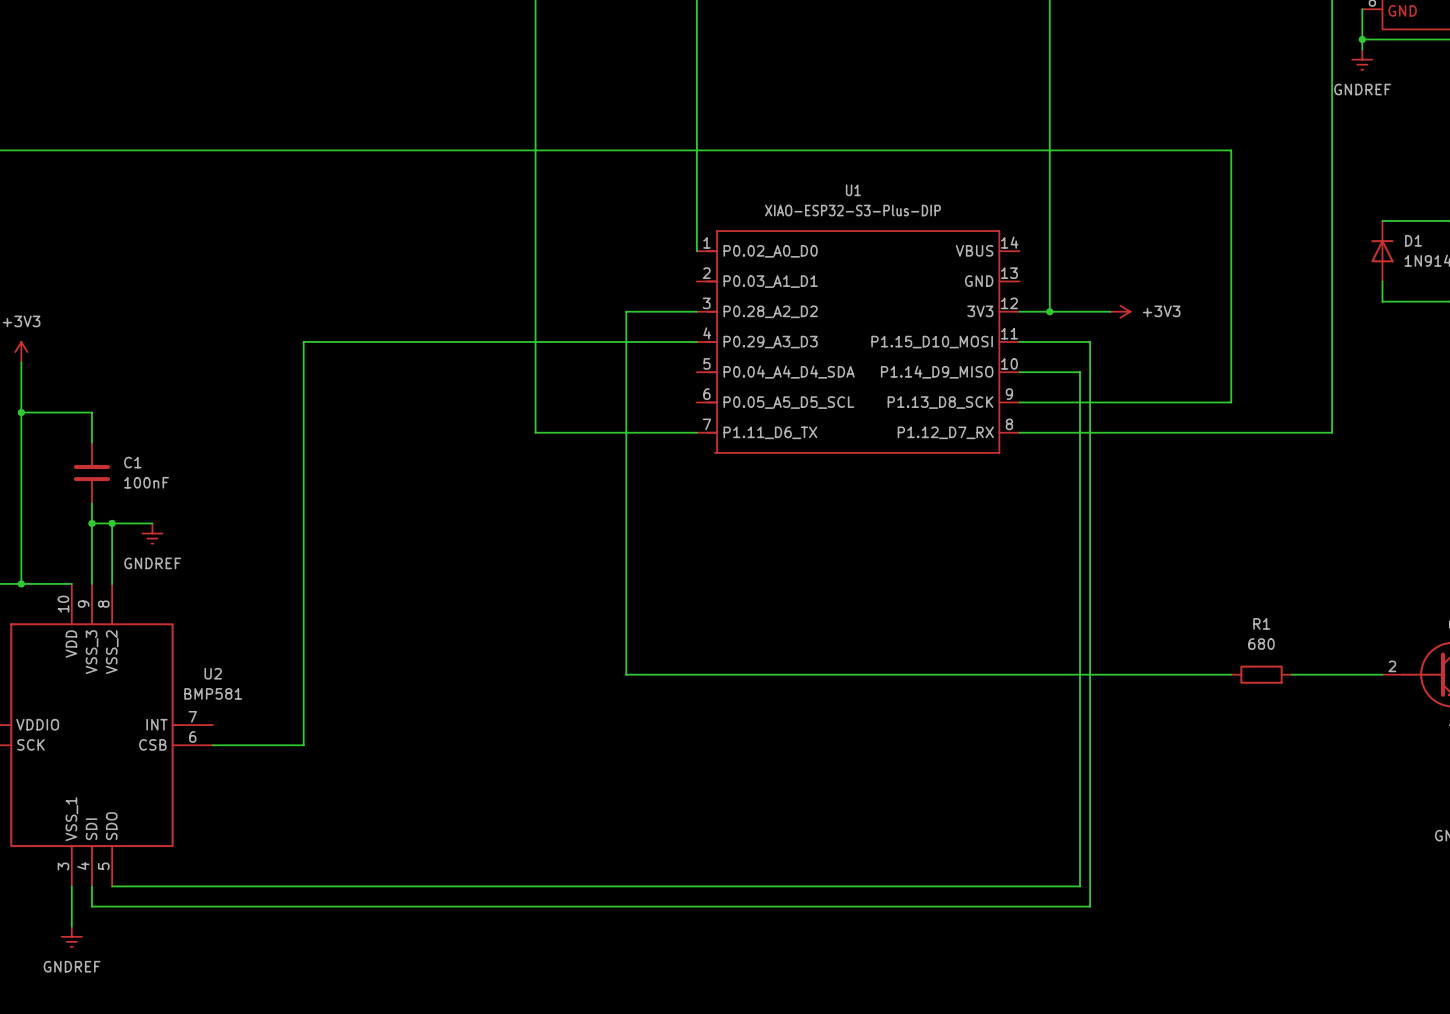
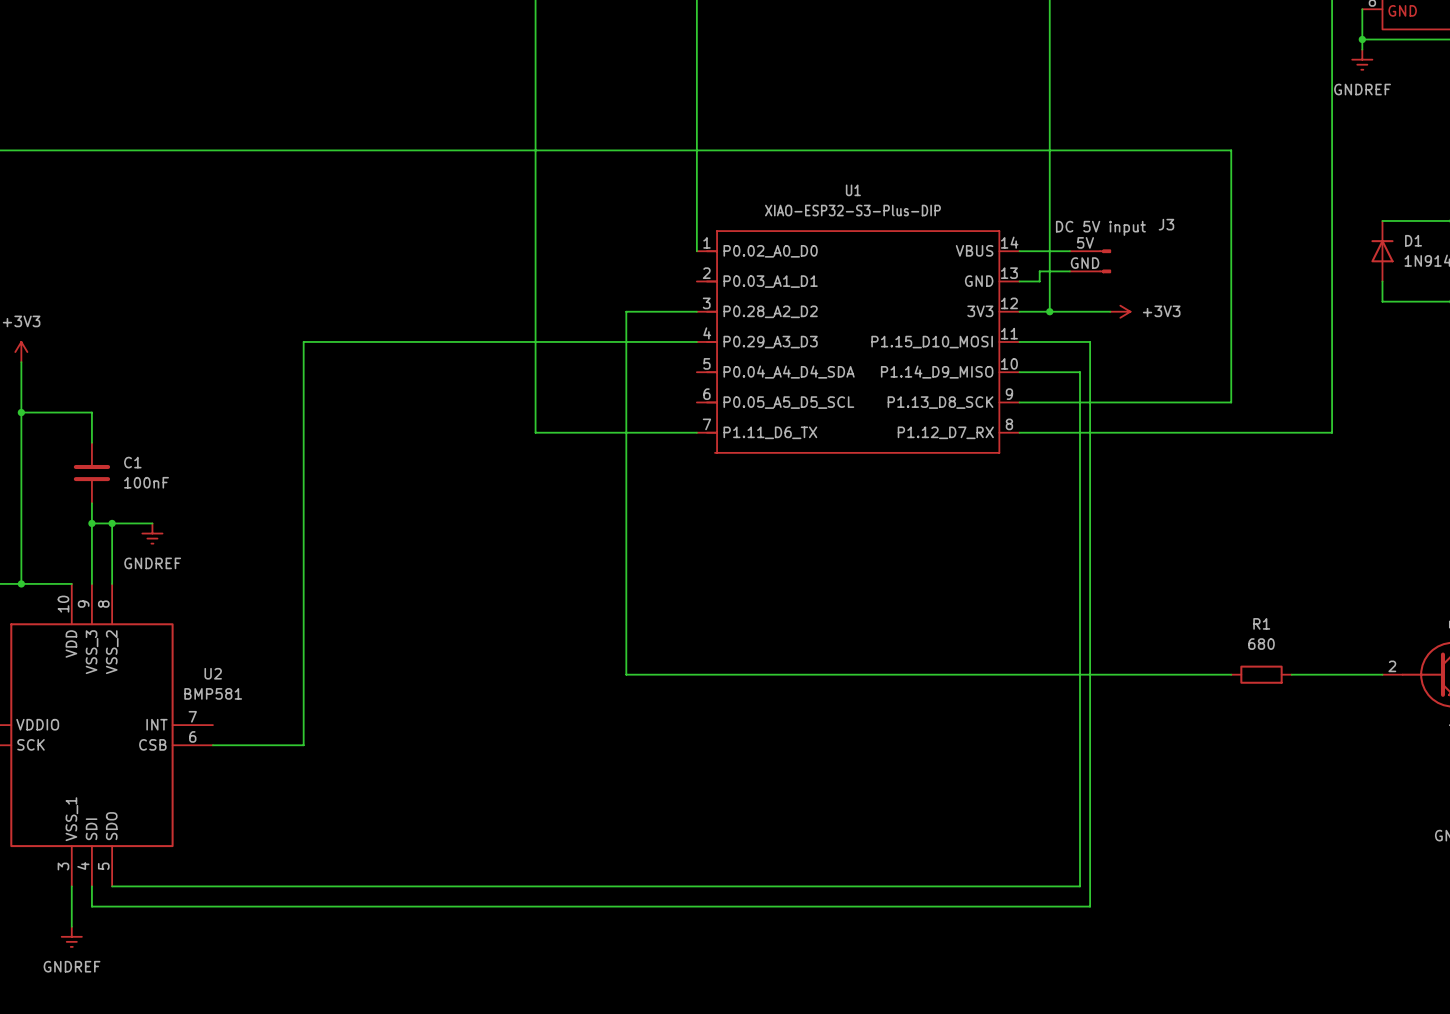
wire: none -> (1019, 251) (1069, 251)
J3: none -> DC 5V input (1090, 261)
wire: none -> (1069, 271) (1039, 271) (1039, 281) (1019, 281)

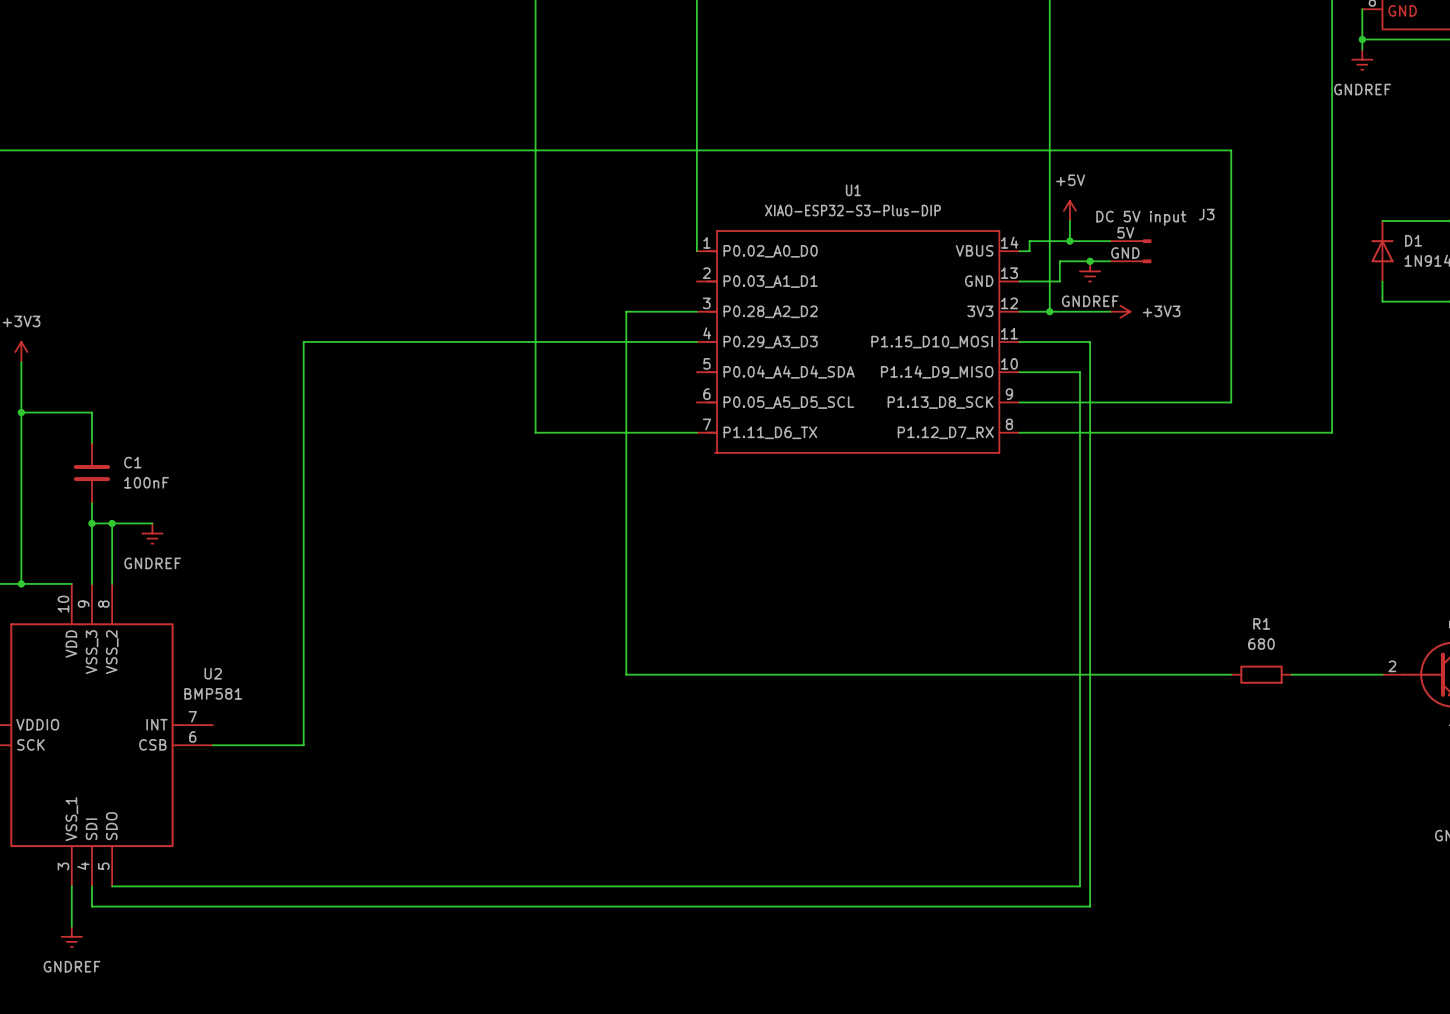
power symbol: none -> +5V (1069, 210)
wire: none -> (1069, 220) (1069, 241)
junction: none -> (1069, 241)
wire: (1029, 251) (1069, 251) -> (1029, 251) (1029, 241) (1110, 241)
J3 position: (1090, 261) -> (1130, 251)
junction: none -> (1090, 261)
wire: (1069, 271) (1039, 271) (1039, 281) -> (1110, 261) (1059, 261) (1059, 281) (1039, 281)
power symbol: none -> GNDREF (1090, 271)

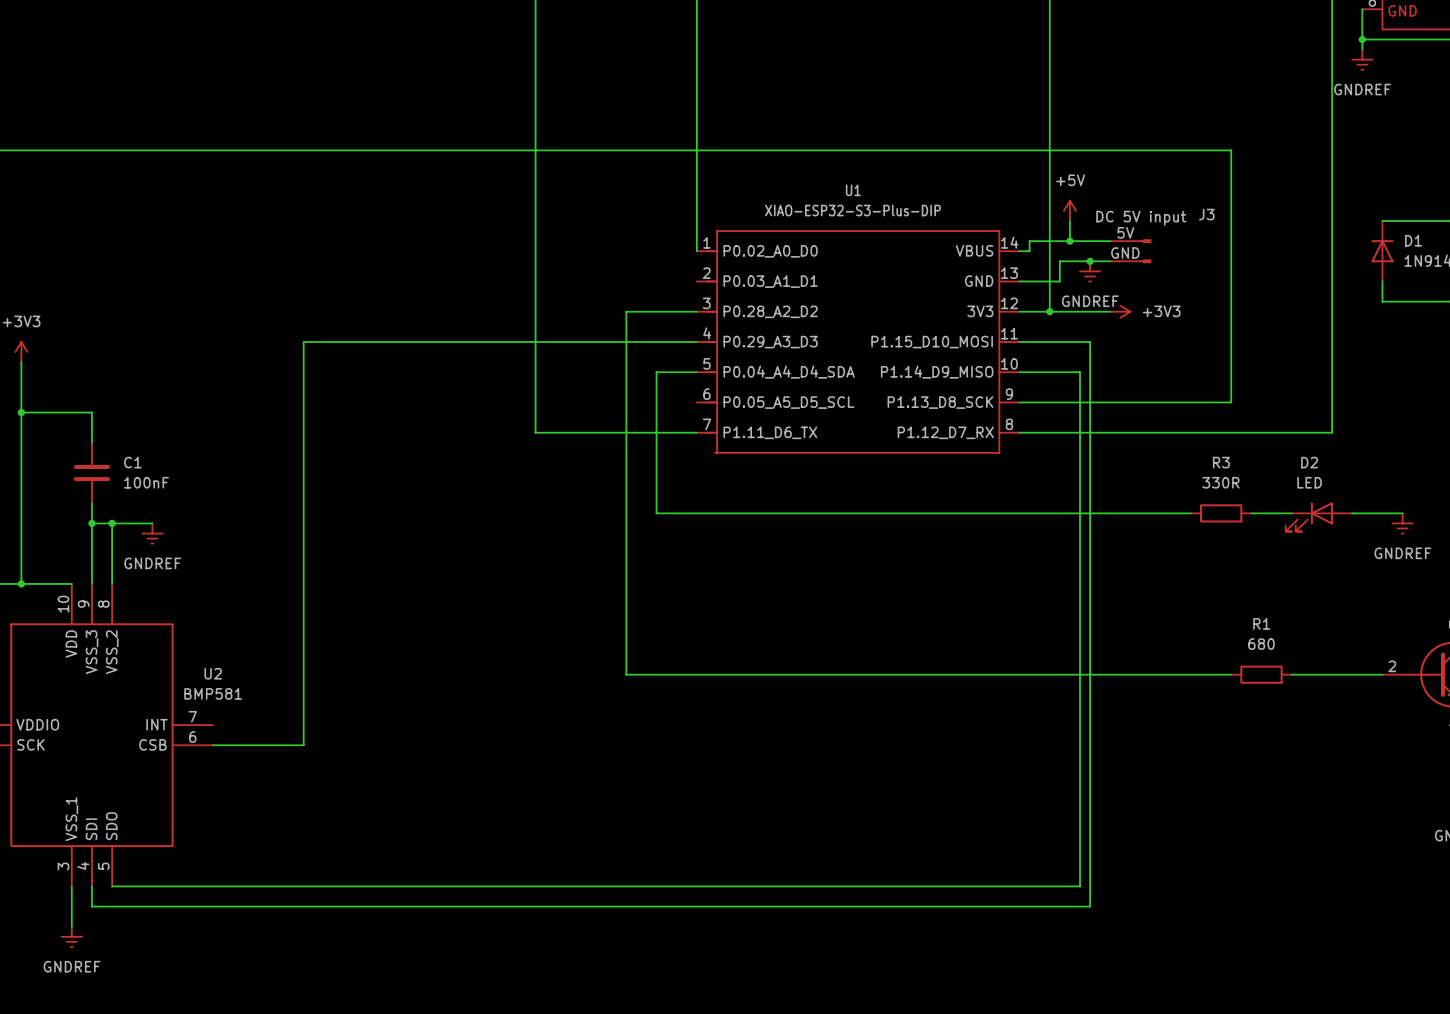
wire: none -> (696, 372) (656, 372) (656, 513) (1190, 513)
R3: none -> 330R (1221, 513)
wire: none -> (1251, 513) (1291, 513)
wire: none -> (1352, 513) (1402, 513)
D2: none -> LED (1318, 516)
power symbol: none -> GNDREF (1402, 523)

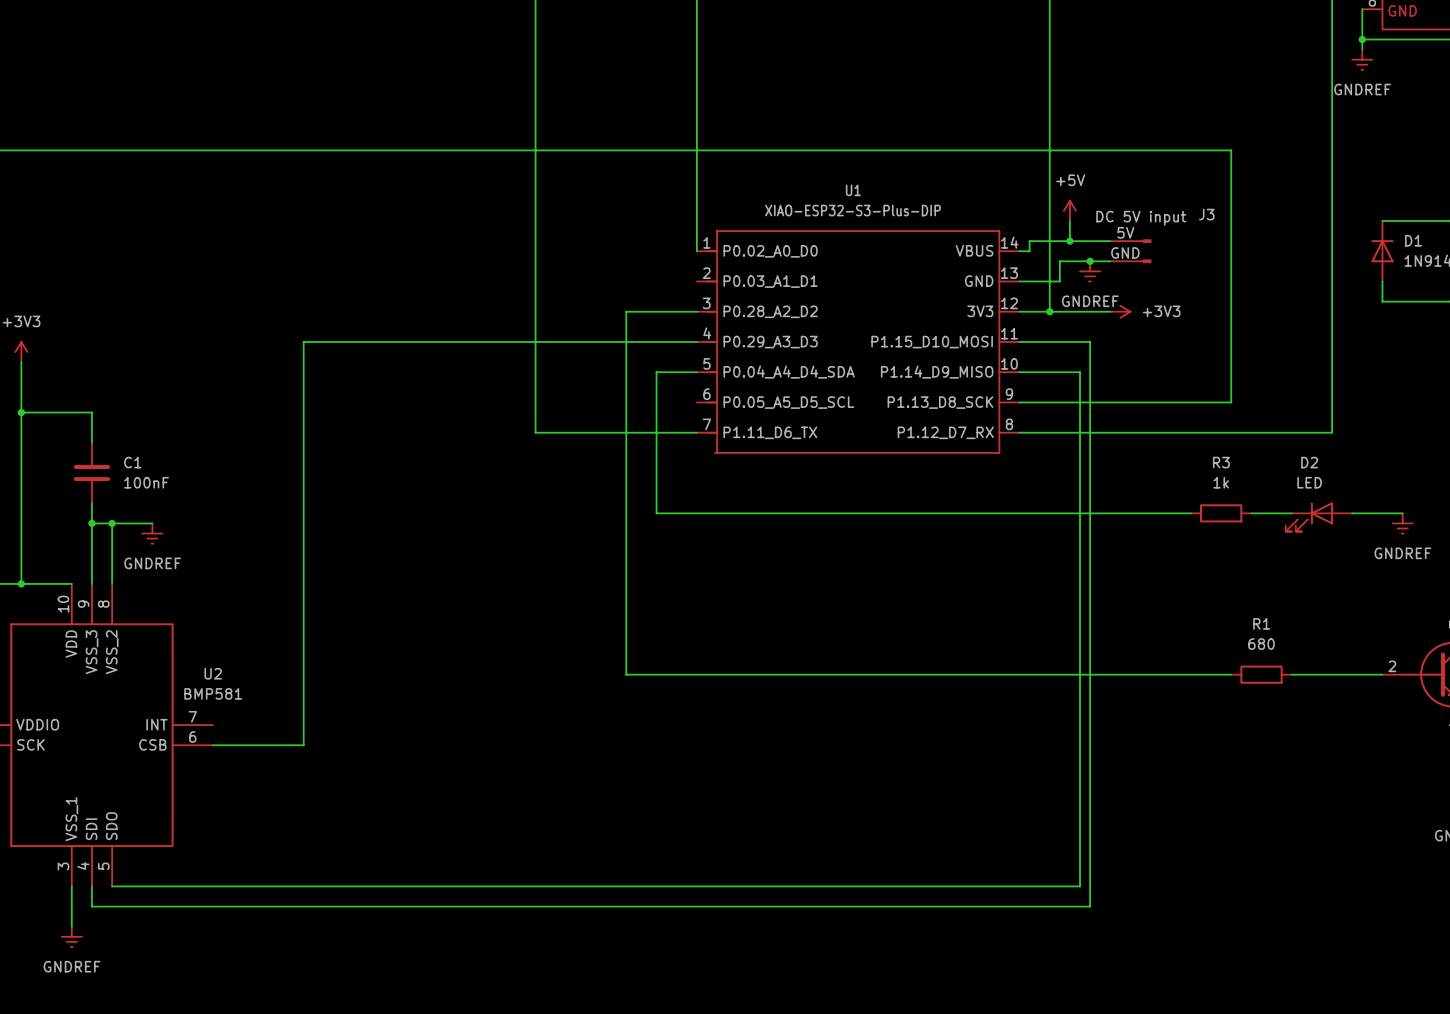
R3 value: 330R (1220, 482) -> 1k (1221, 482)

